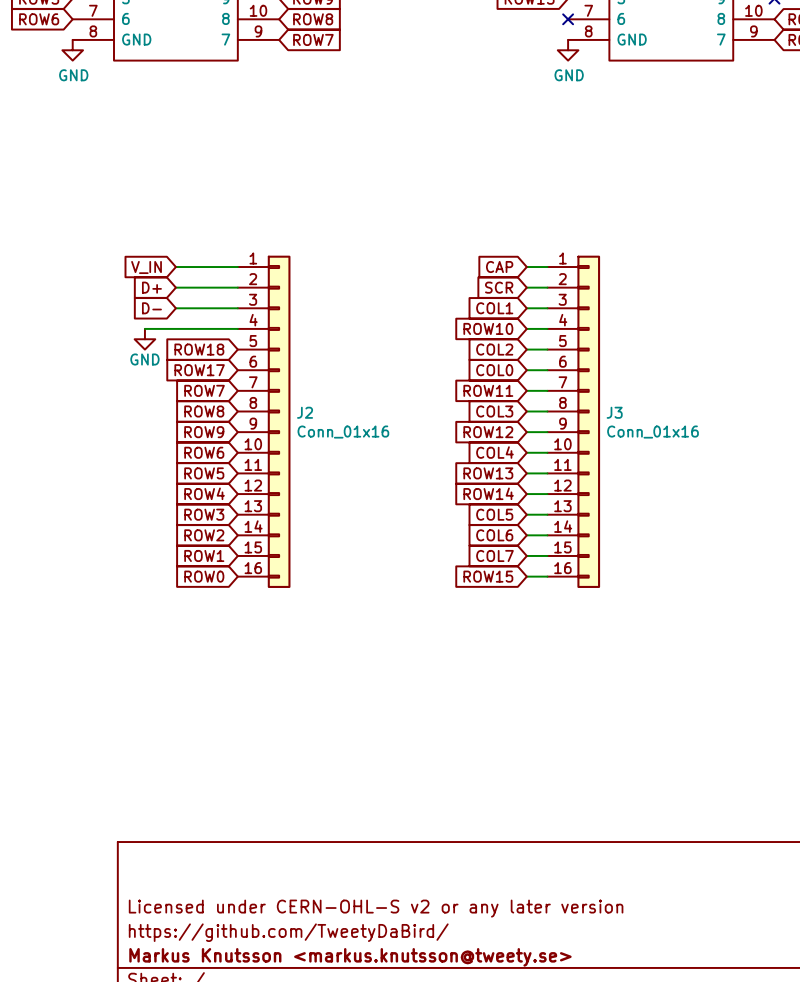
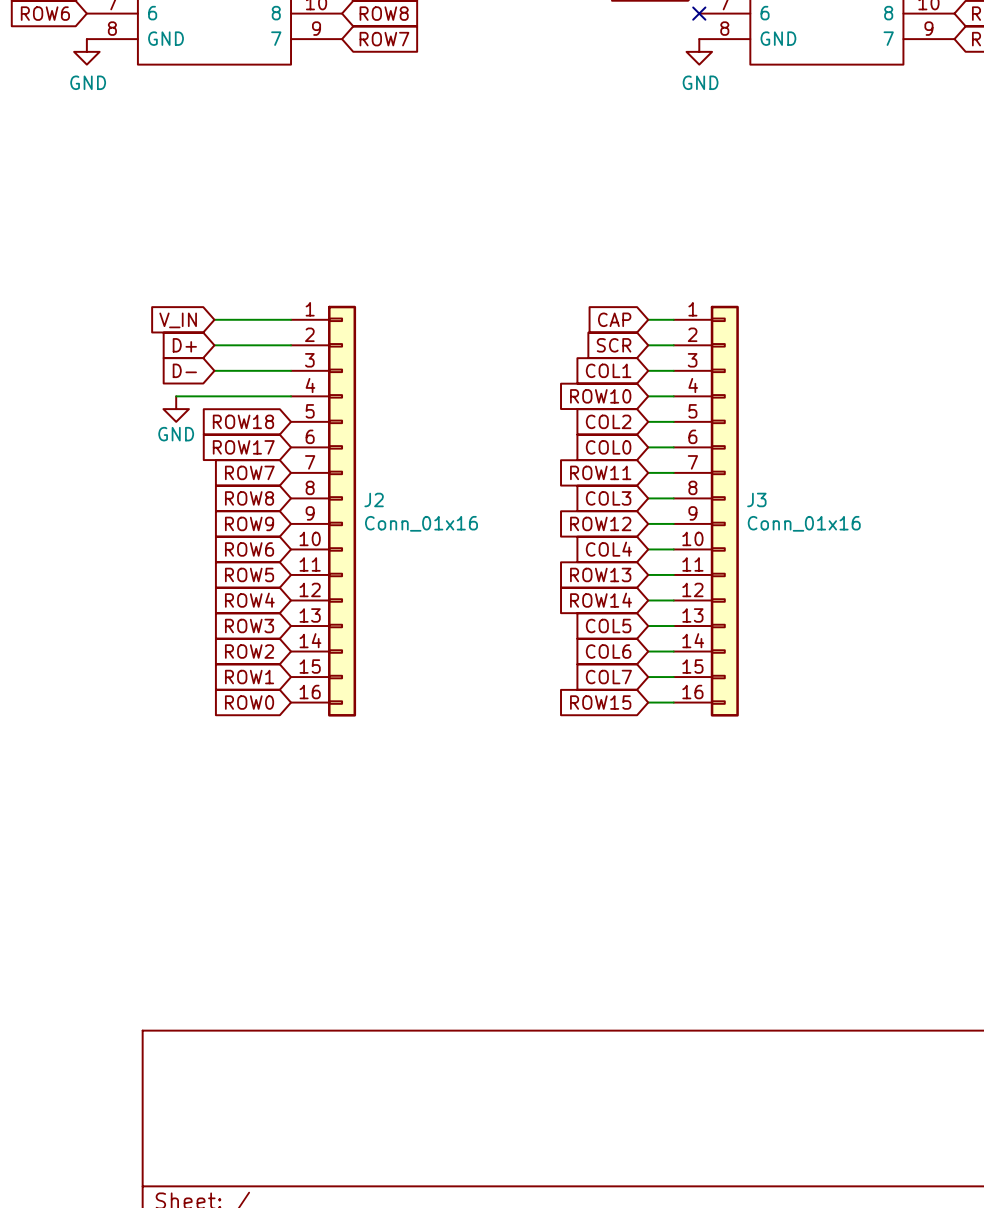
title block: Licensed under CERN-OHL-S v2 or any later version (376, 908) -> none
title block: https://github.com/TweetyDaBird/ (288, 932) -> none
title block: Markus Knutsson <markus.knutsson@tweety.se> (350, 957) -> none

